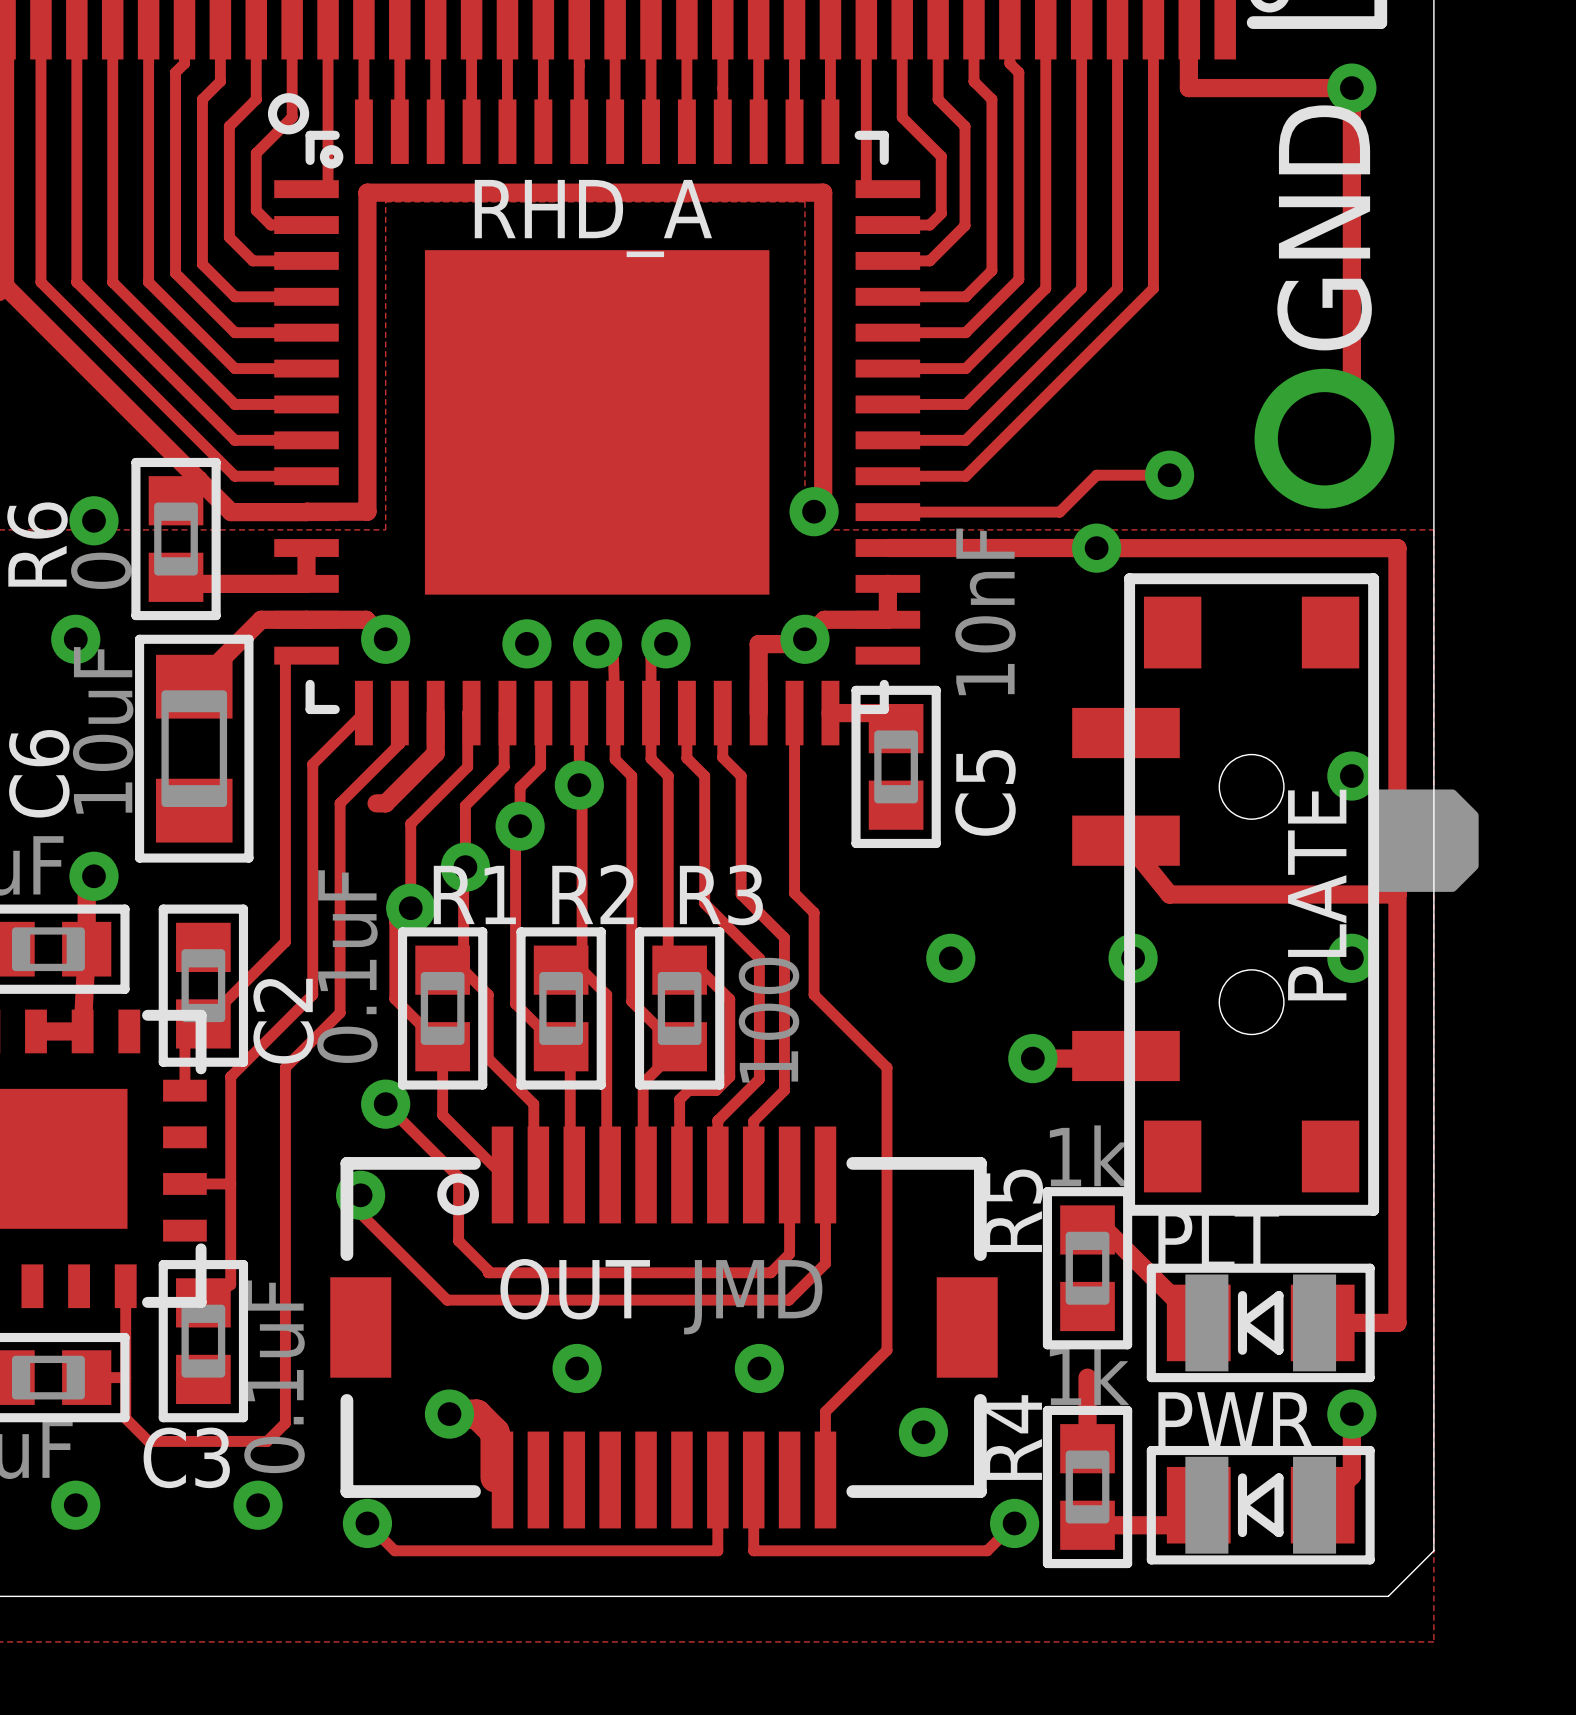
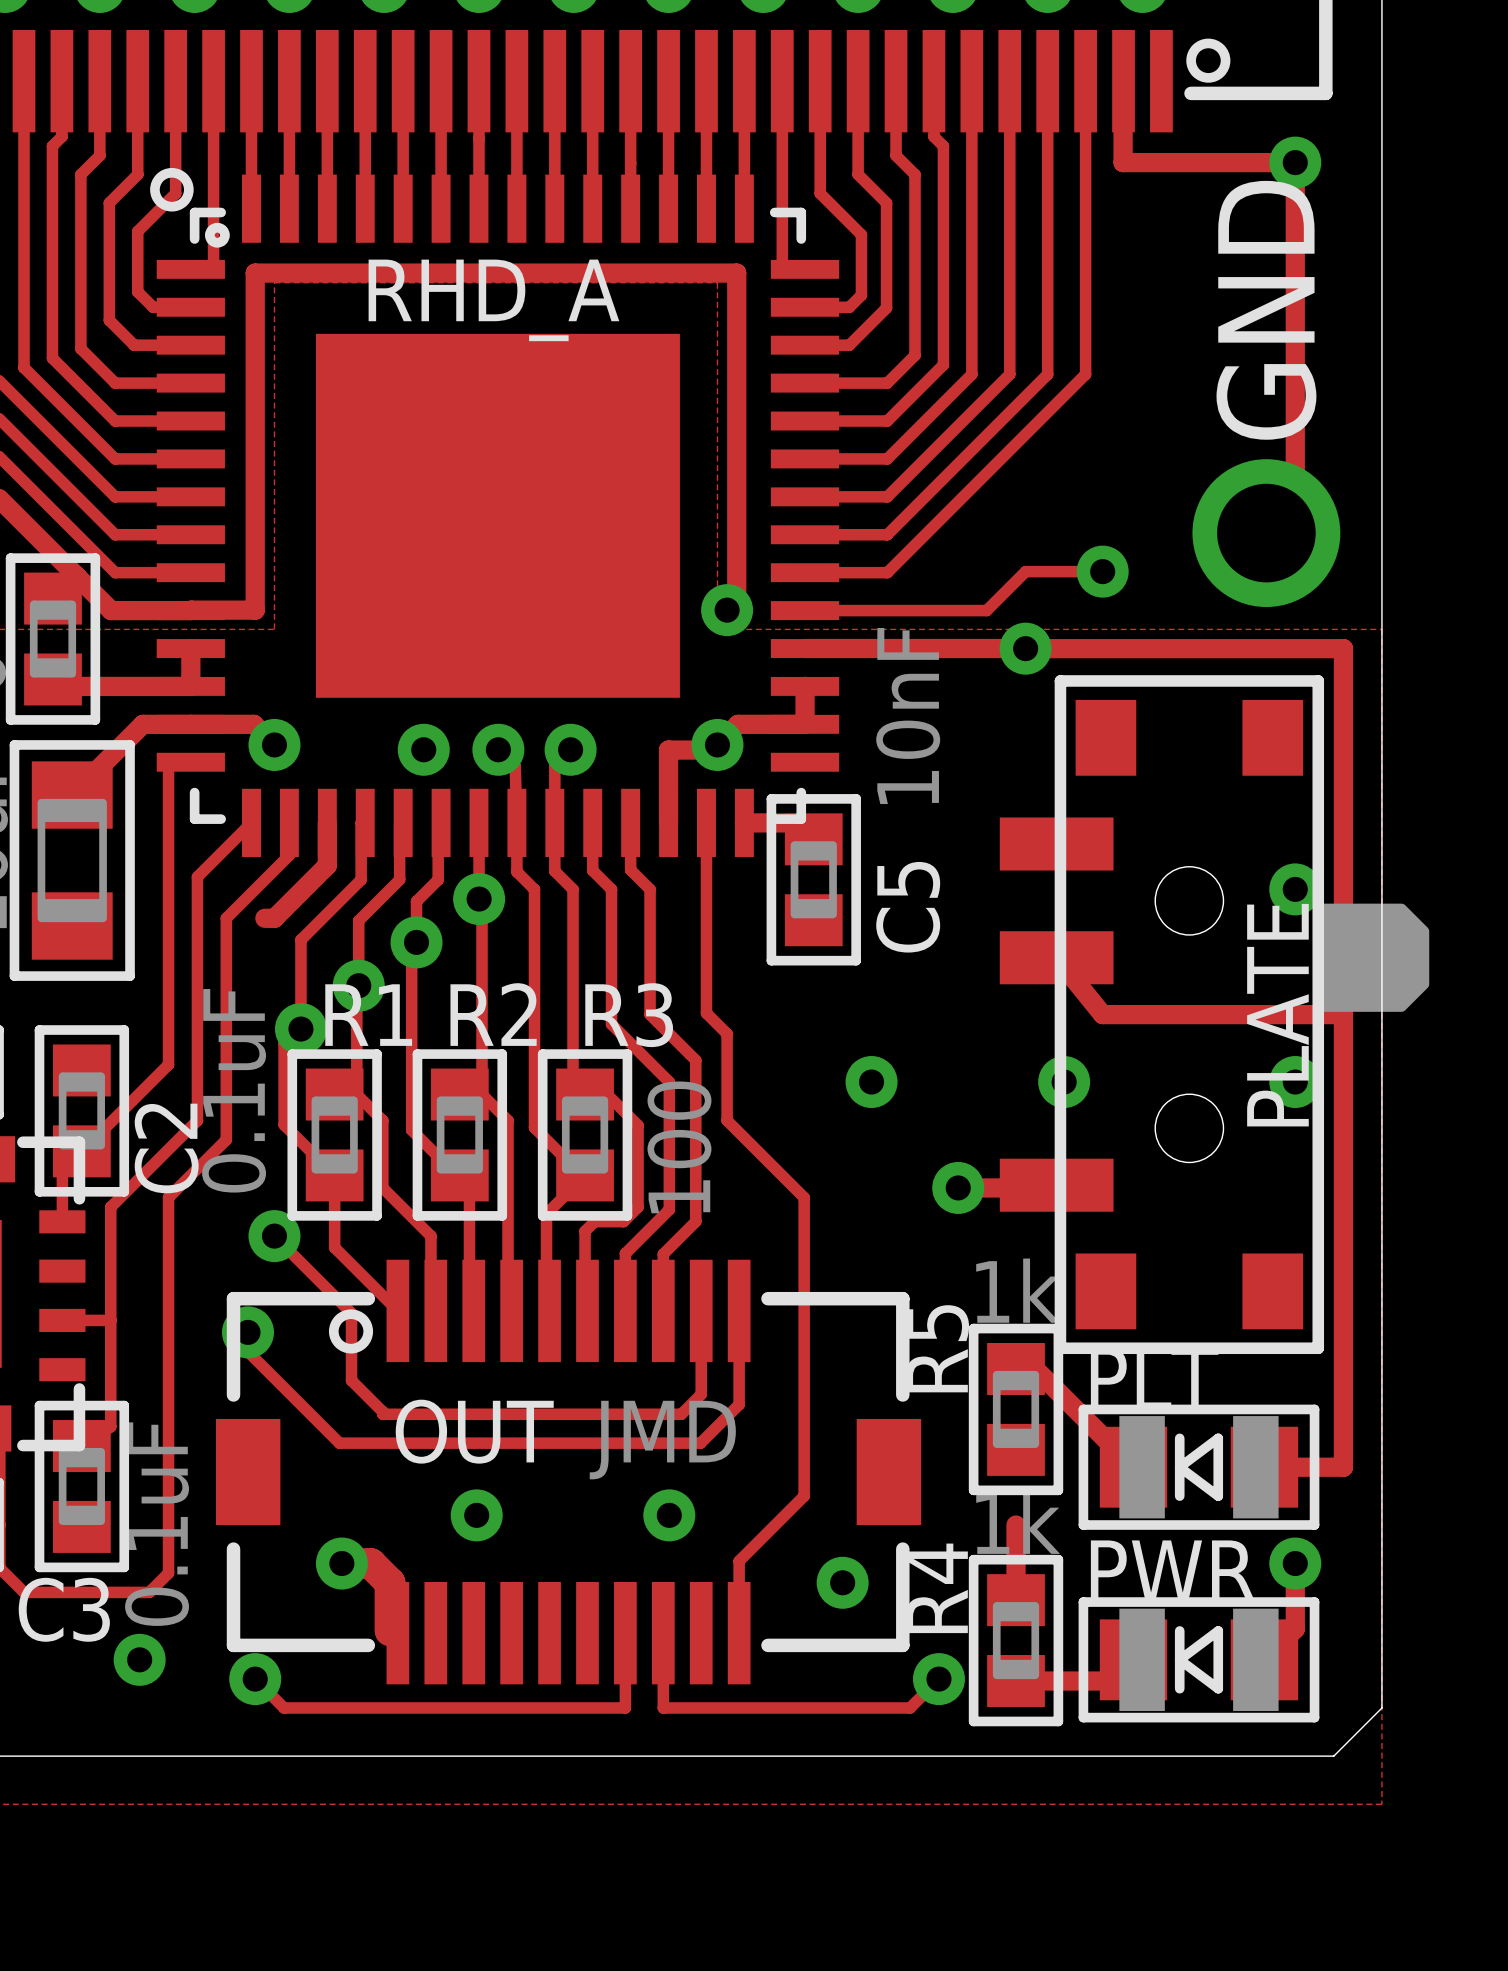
PLATE name position: PLATE (1317, 895) -> PLATE (1277, 1015)

